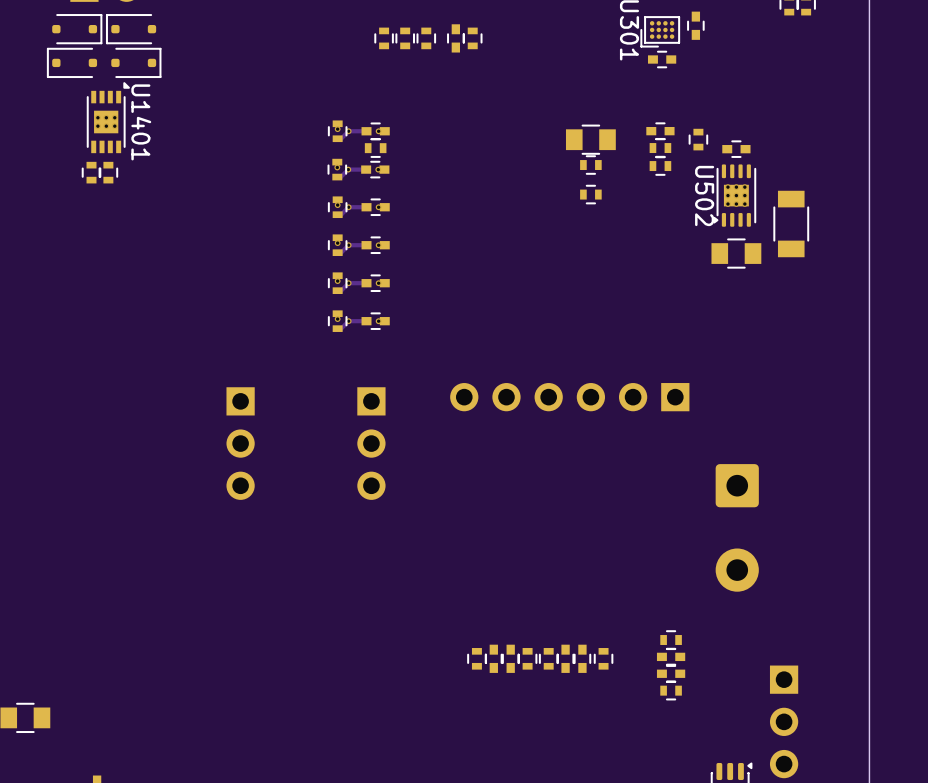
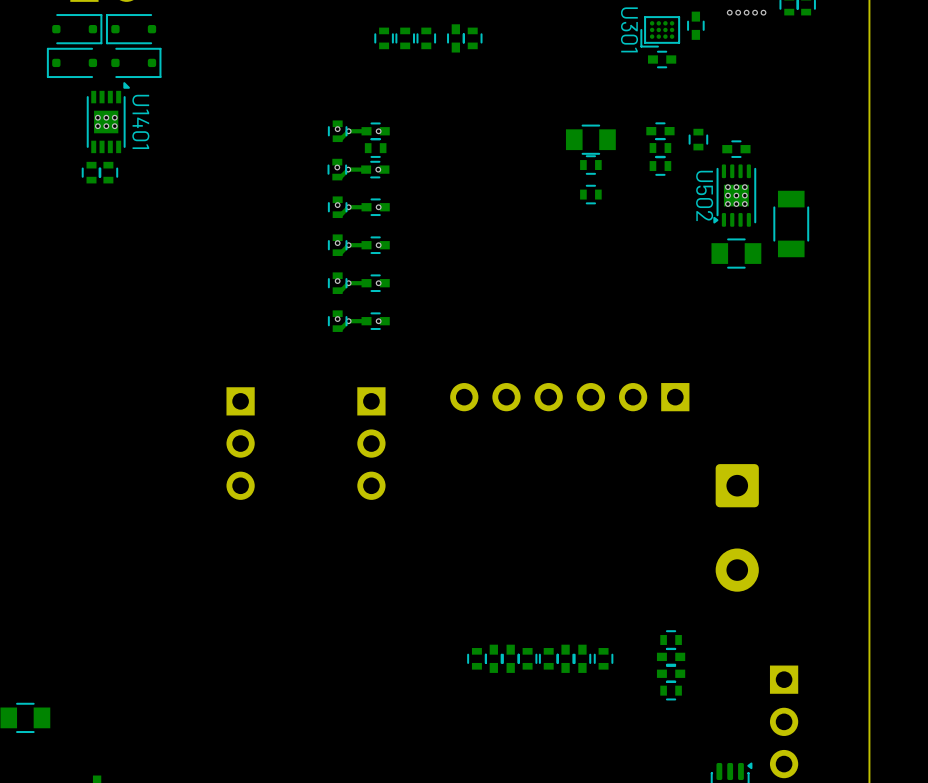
via: none -> (729, 12)
via: none -> (738, 12)
via: none -> (746, 12)
via: none -> (755, 12)
via: none -> (763, 12)

